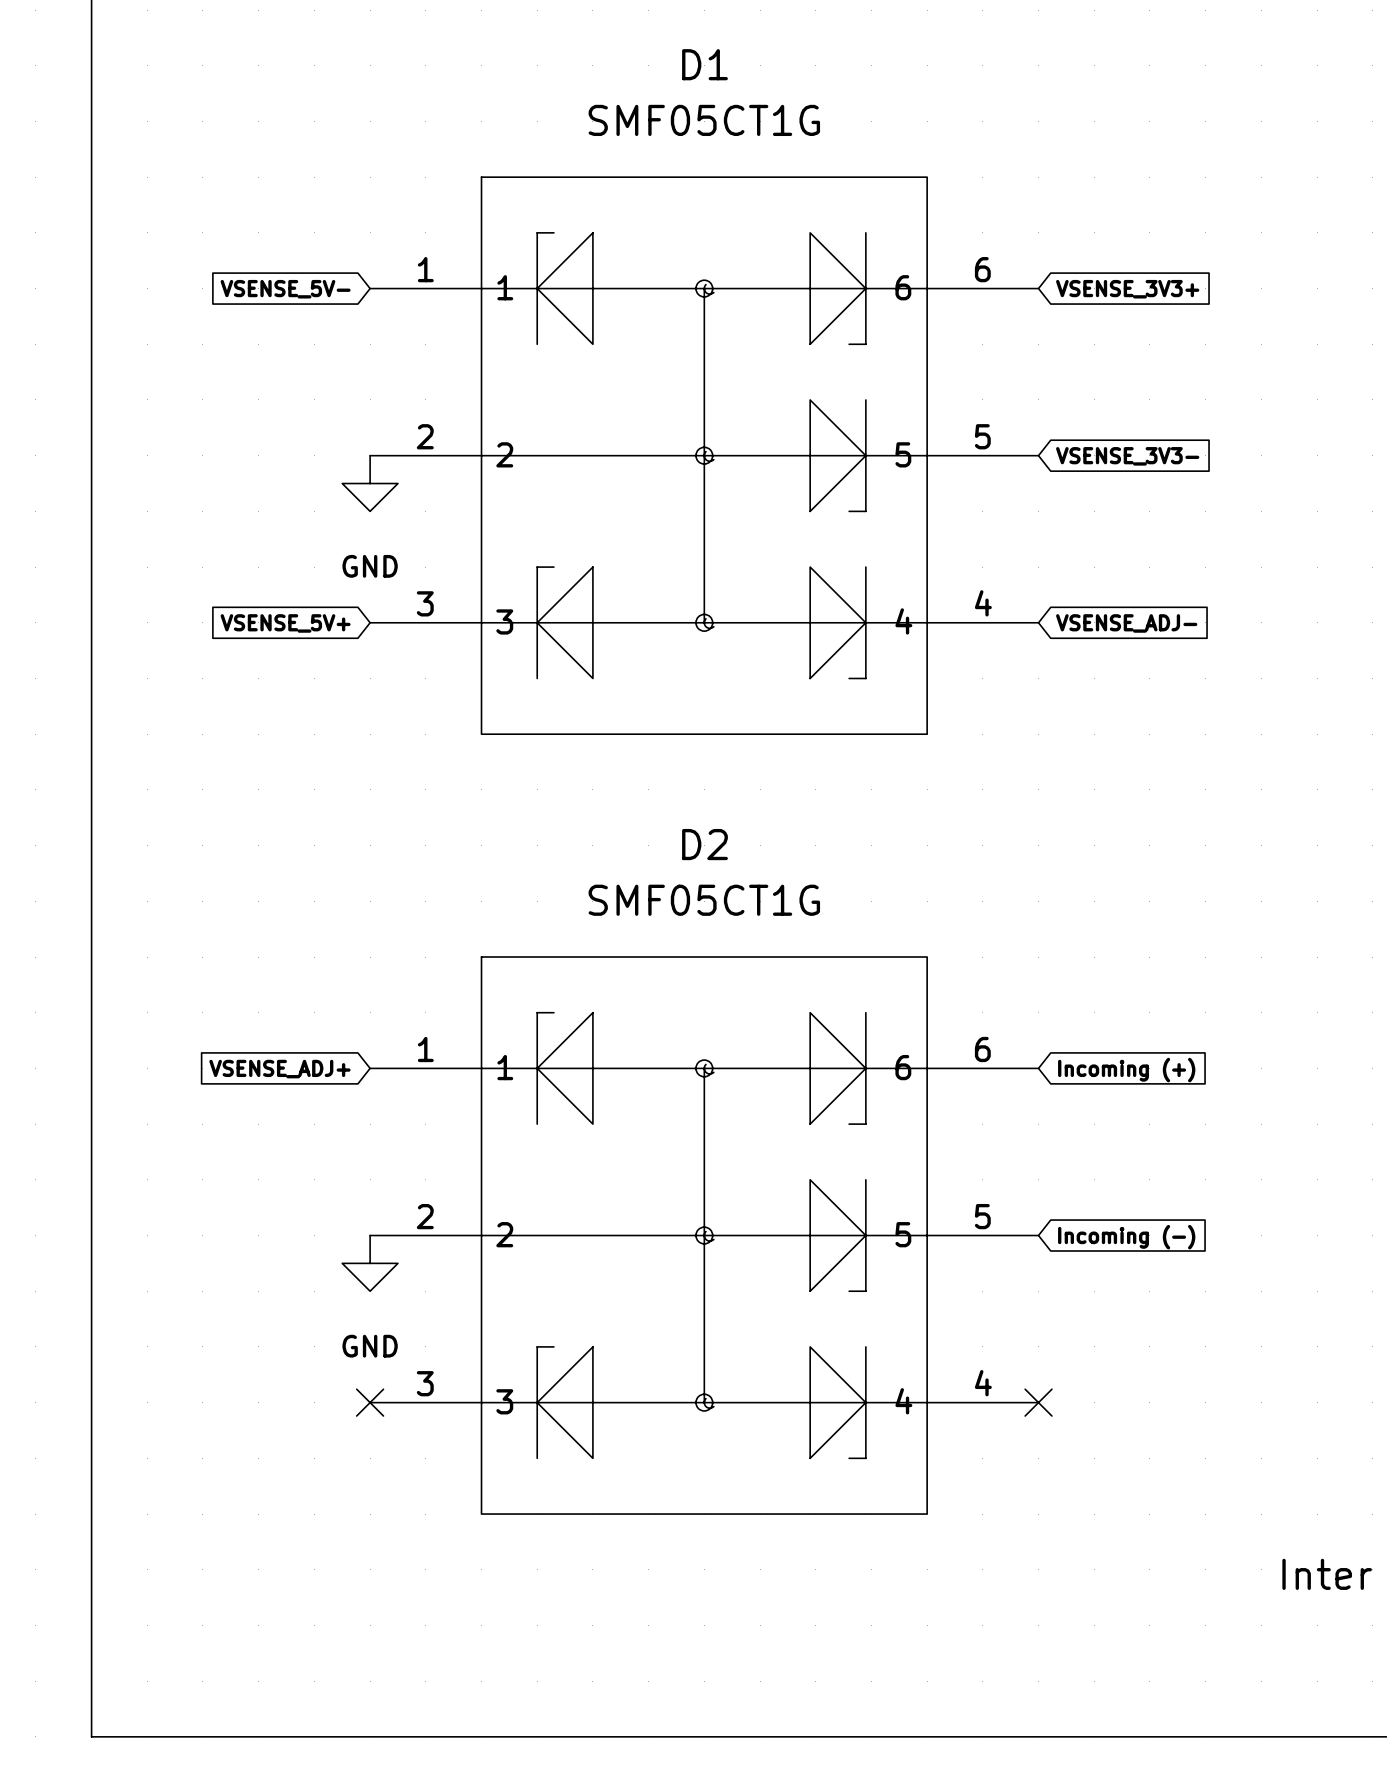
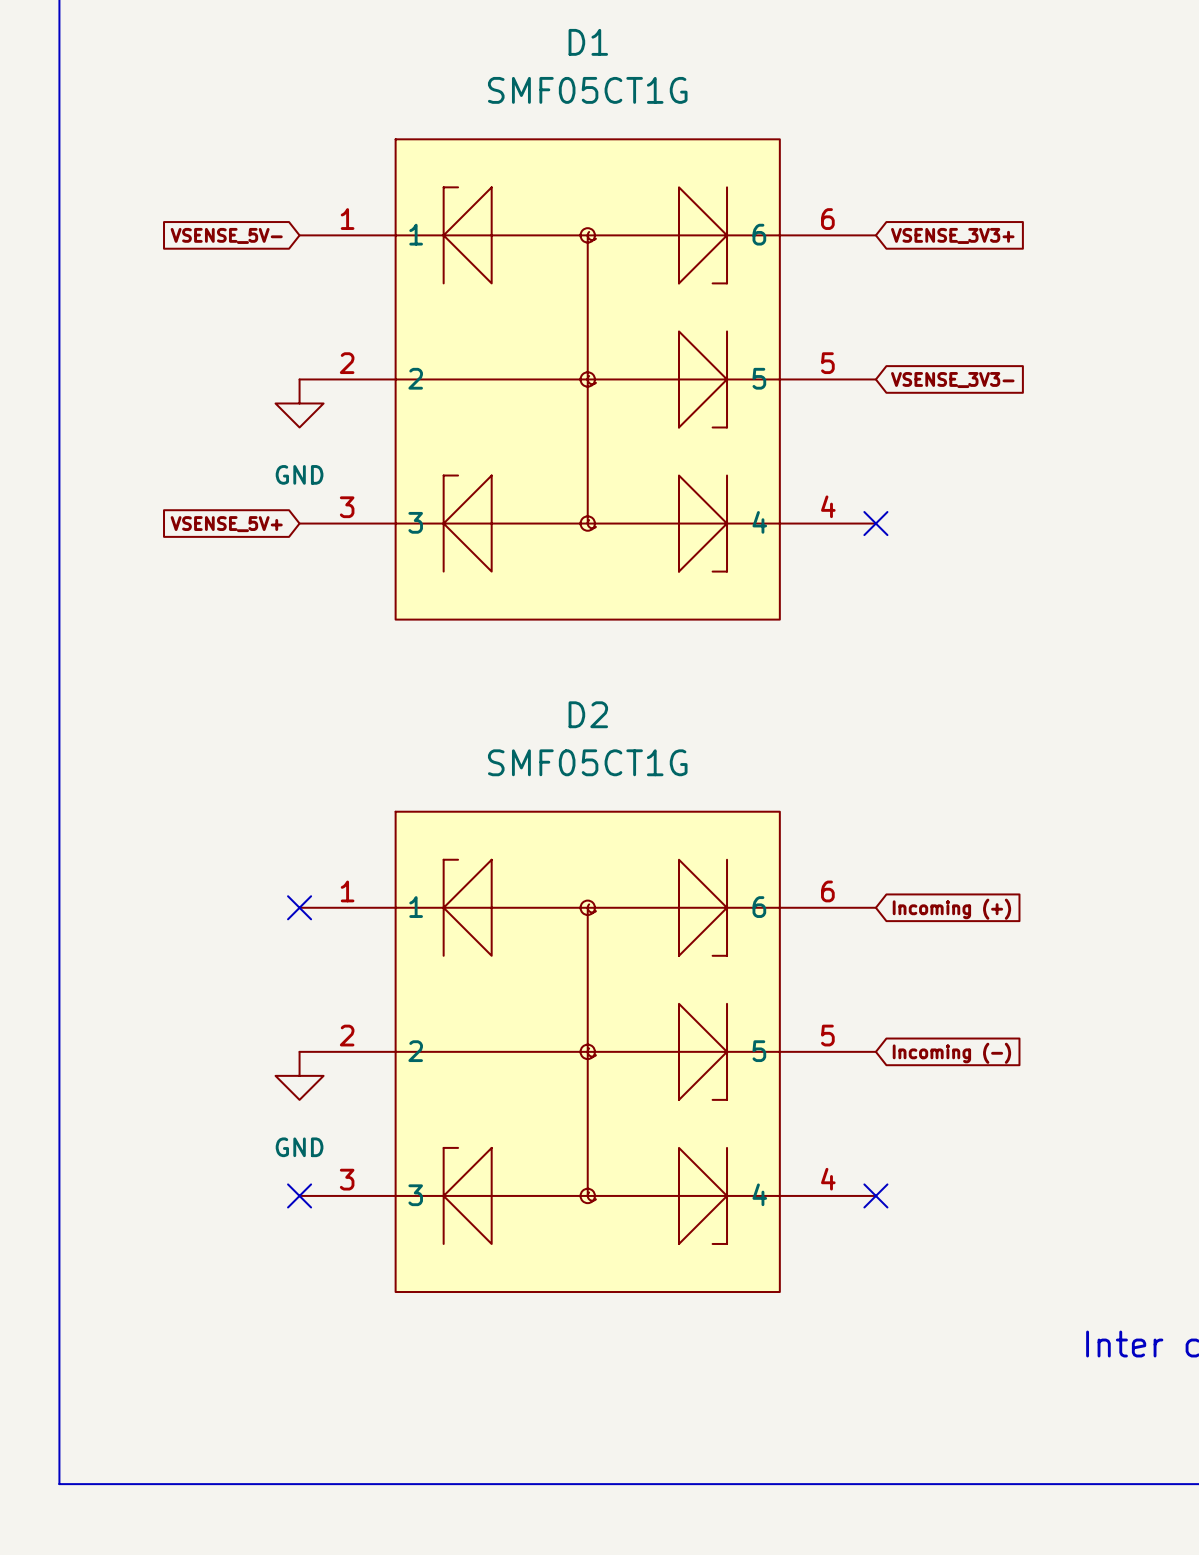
no-connect mark: none -> (875, 523)
global label: VSENSE_ADJ- (1126, 623) -> none
no-connect mark: none -> (299, 907)
global label: VSENSE_ADJ+ (279, 1069) -> none

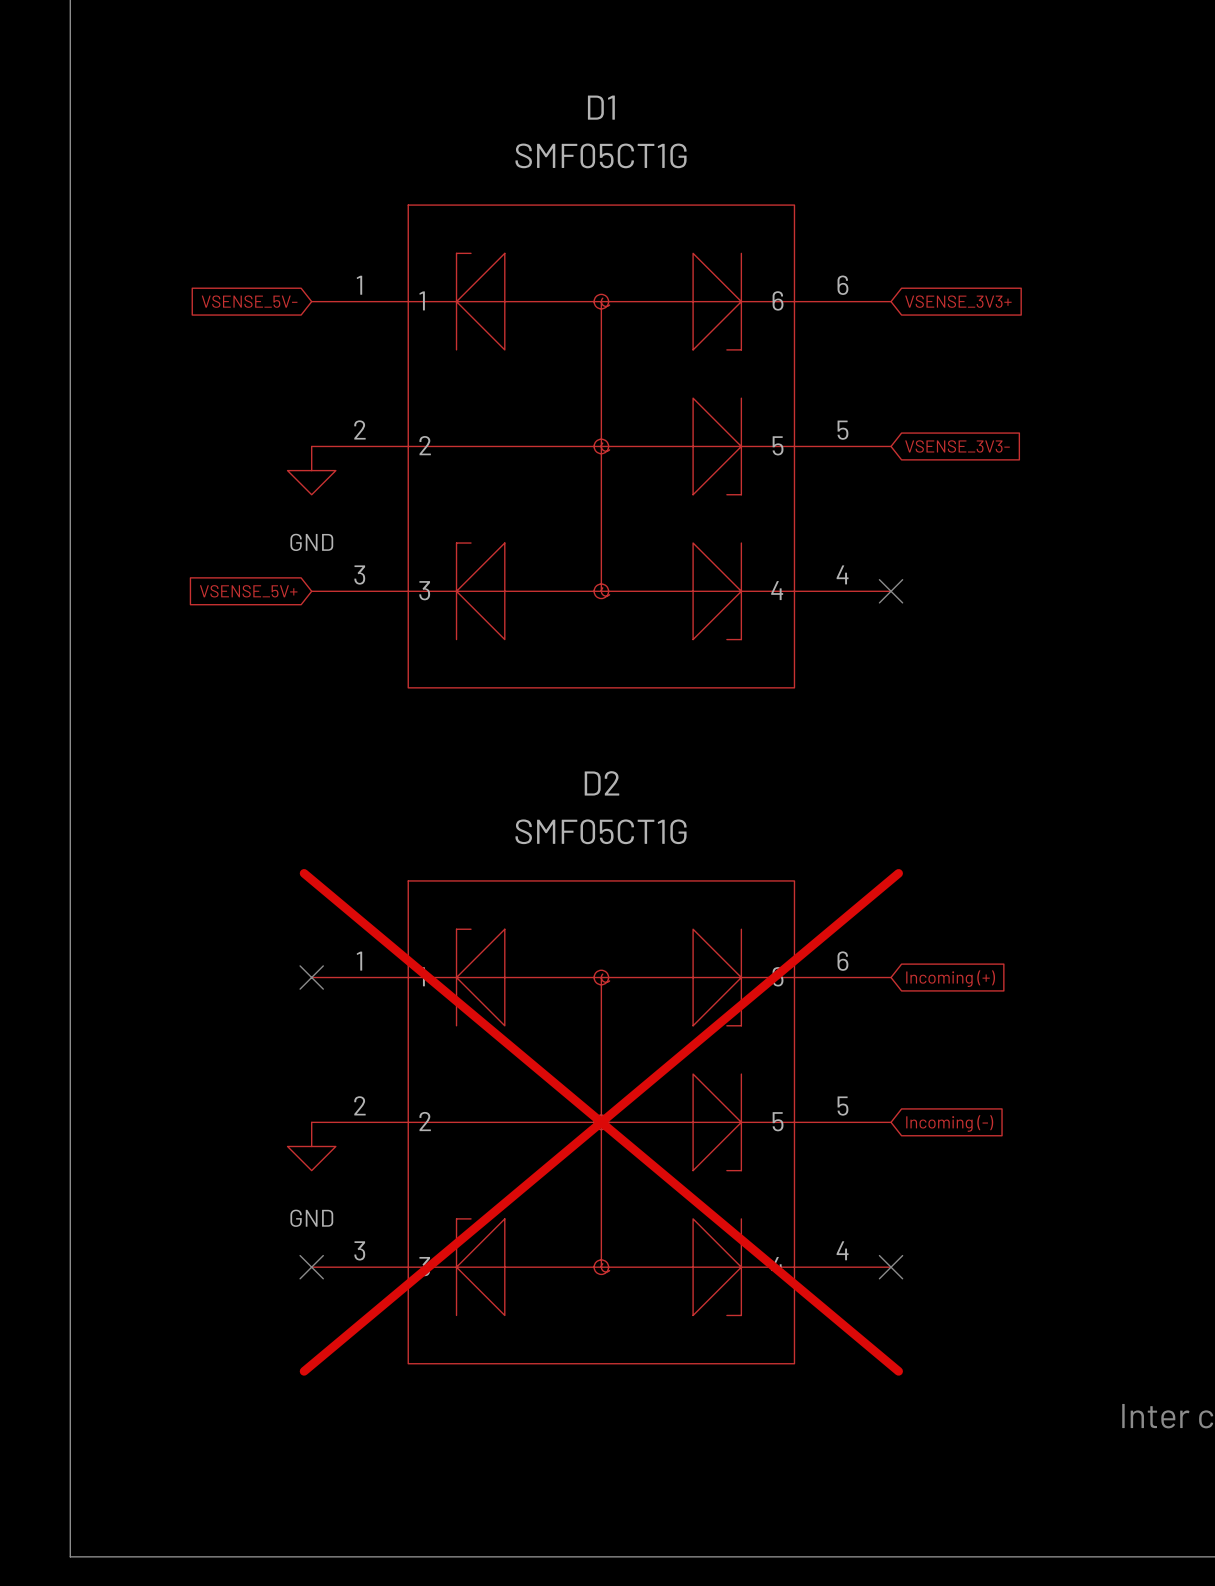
D2 do-not-place cross: none -> (601, 1122)

